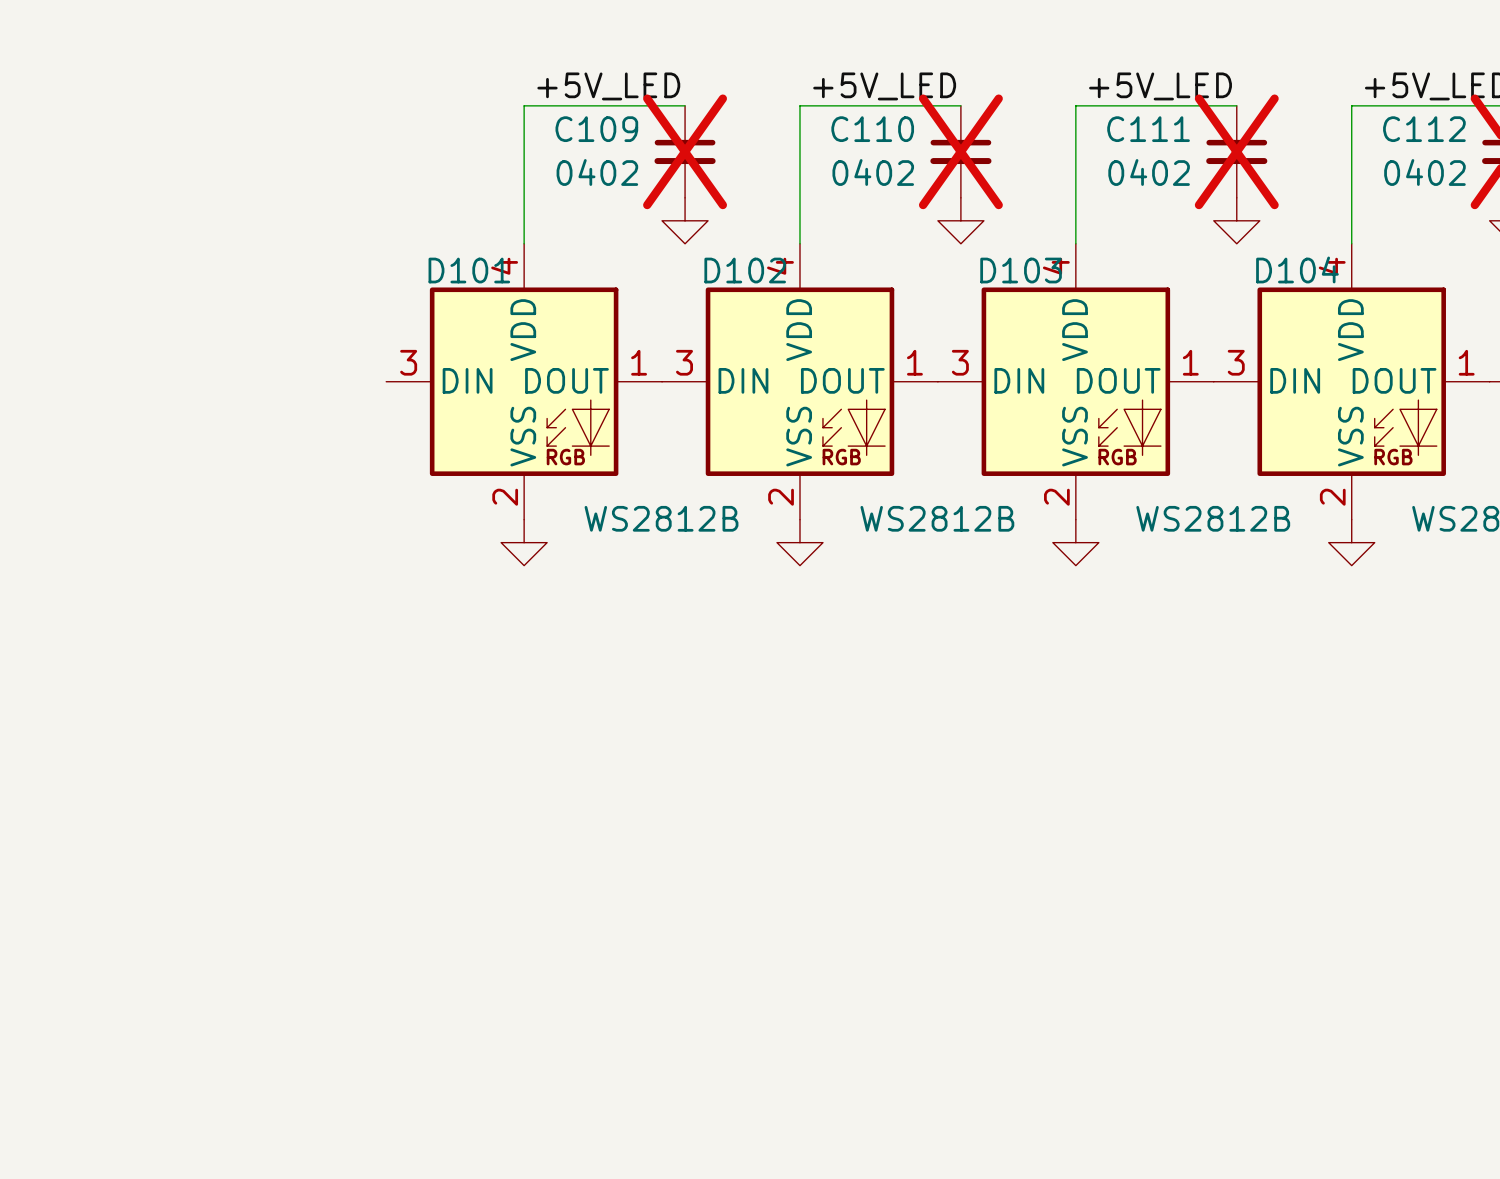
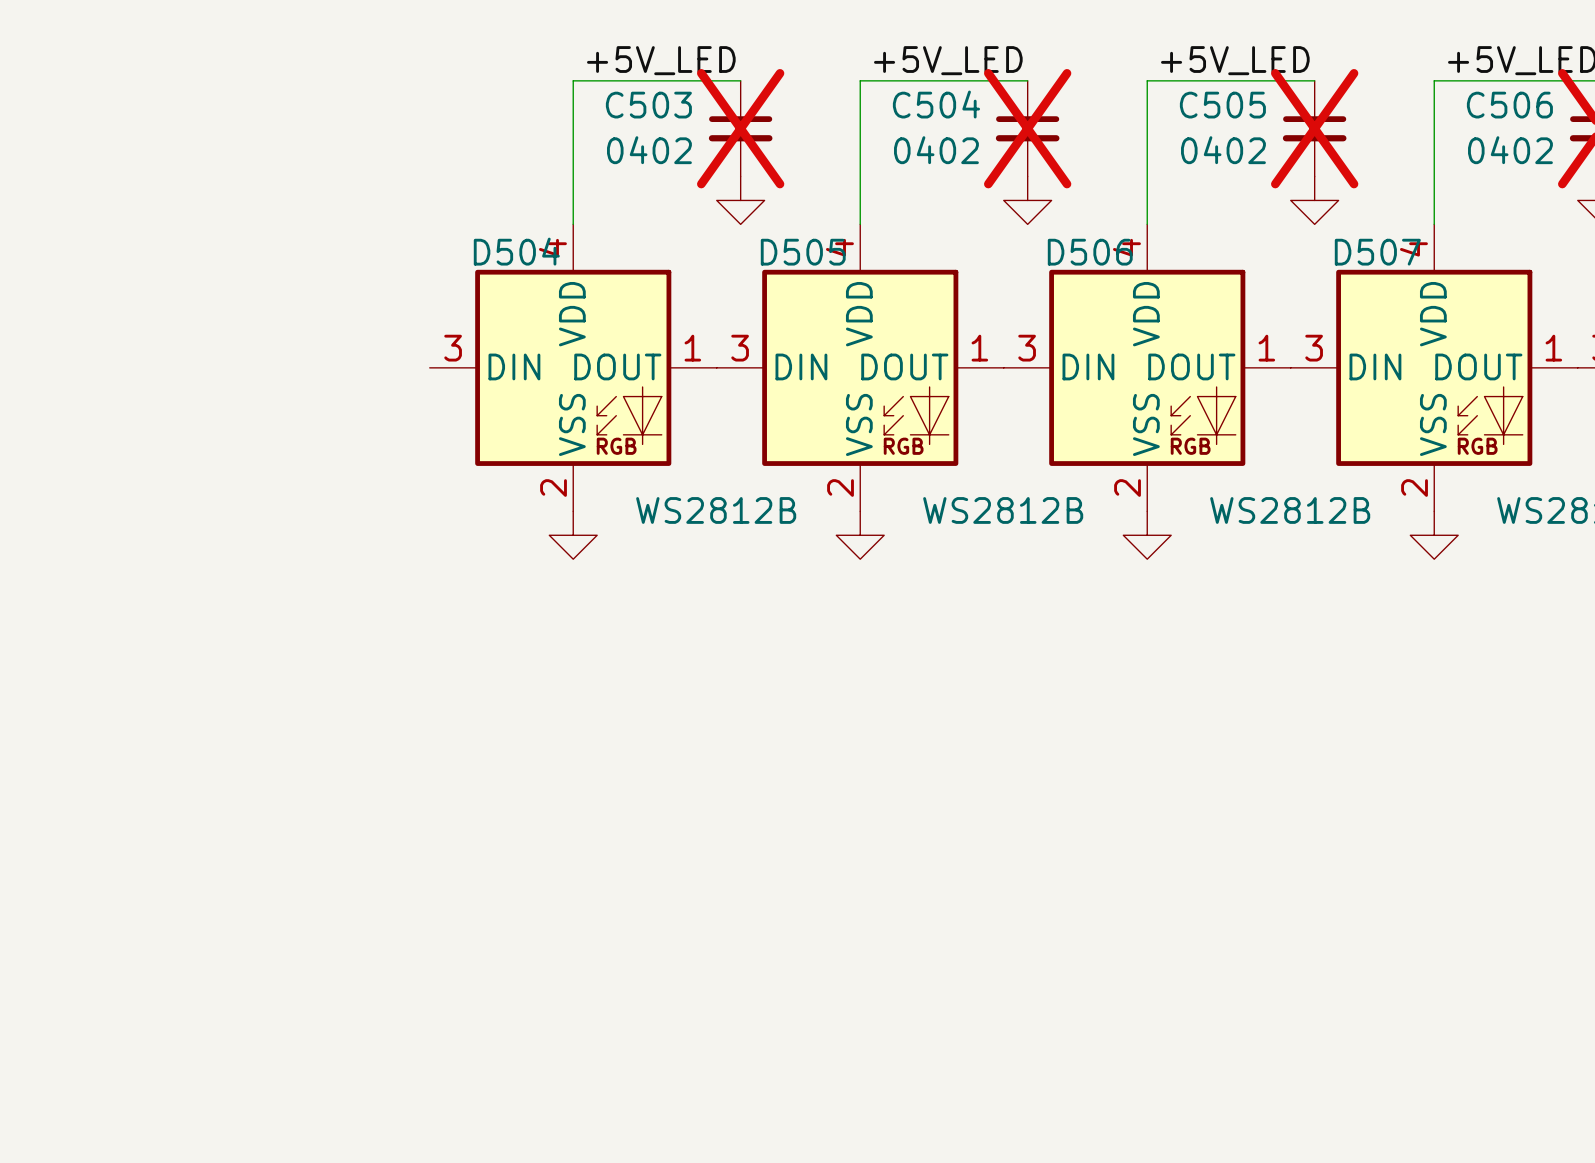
C109 name: C109 (596, 129) -> C503 (648, 105)
C110 name: C110 (872, 129) -> C504 (936, 104)
C111 name: C111 (1148, 129) -> C505 (1222, 105)
C112 name: C112 (1424, 129) -> C506 (1509, 105)
D104 name: D104 (1297, 269) -> D507 (1377, 252)
D101 name: D101 (469, 270) -> D504 (516, 251)
D102 name: D102 (745, 270) -> D505 (803, 252)
D103 name: D103 (1021, 270) -> D506 (1090, 252)

